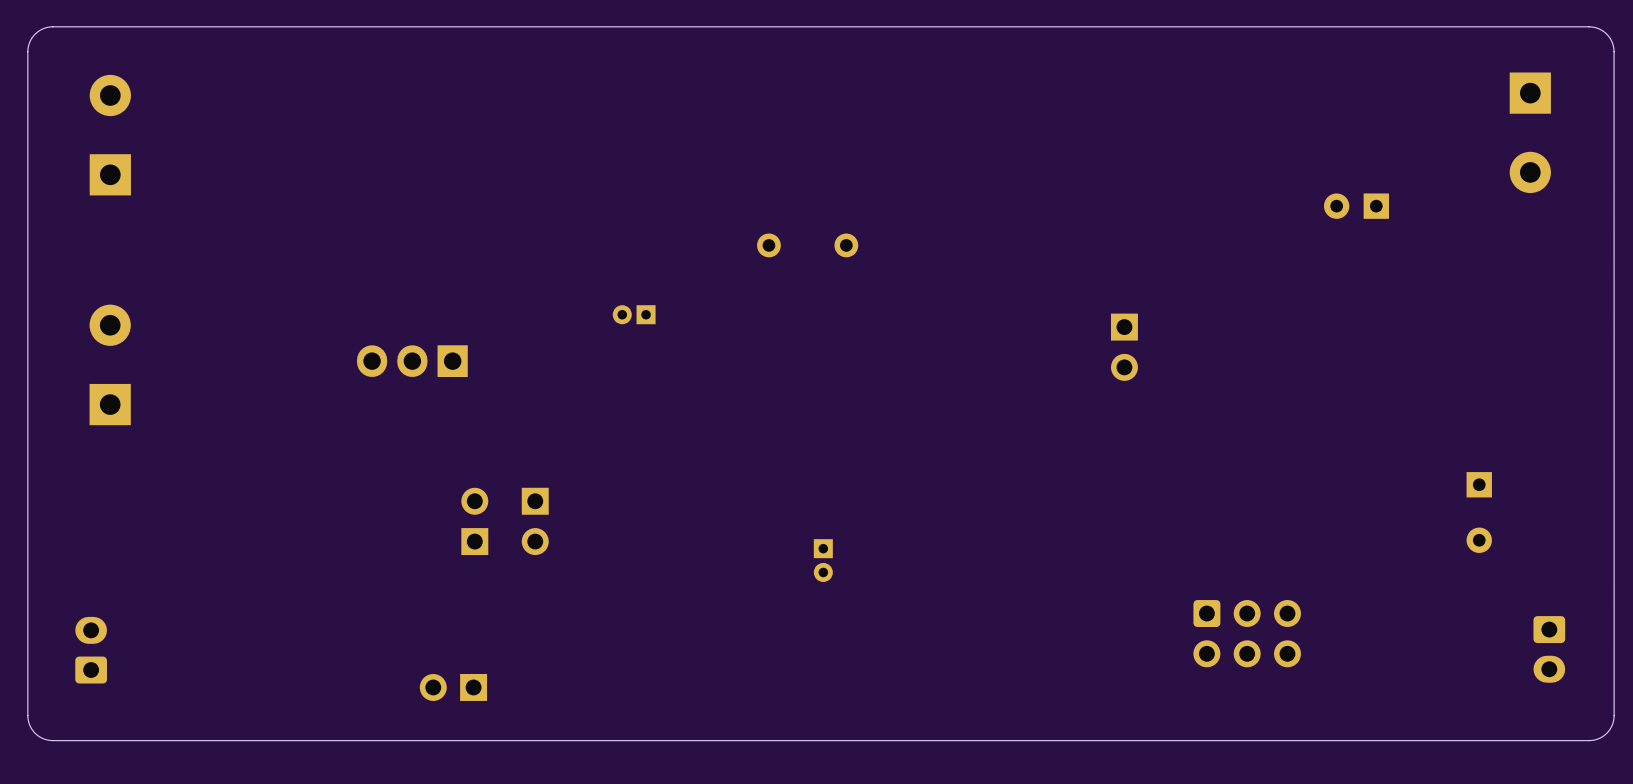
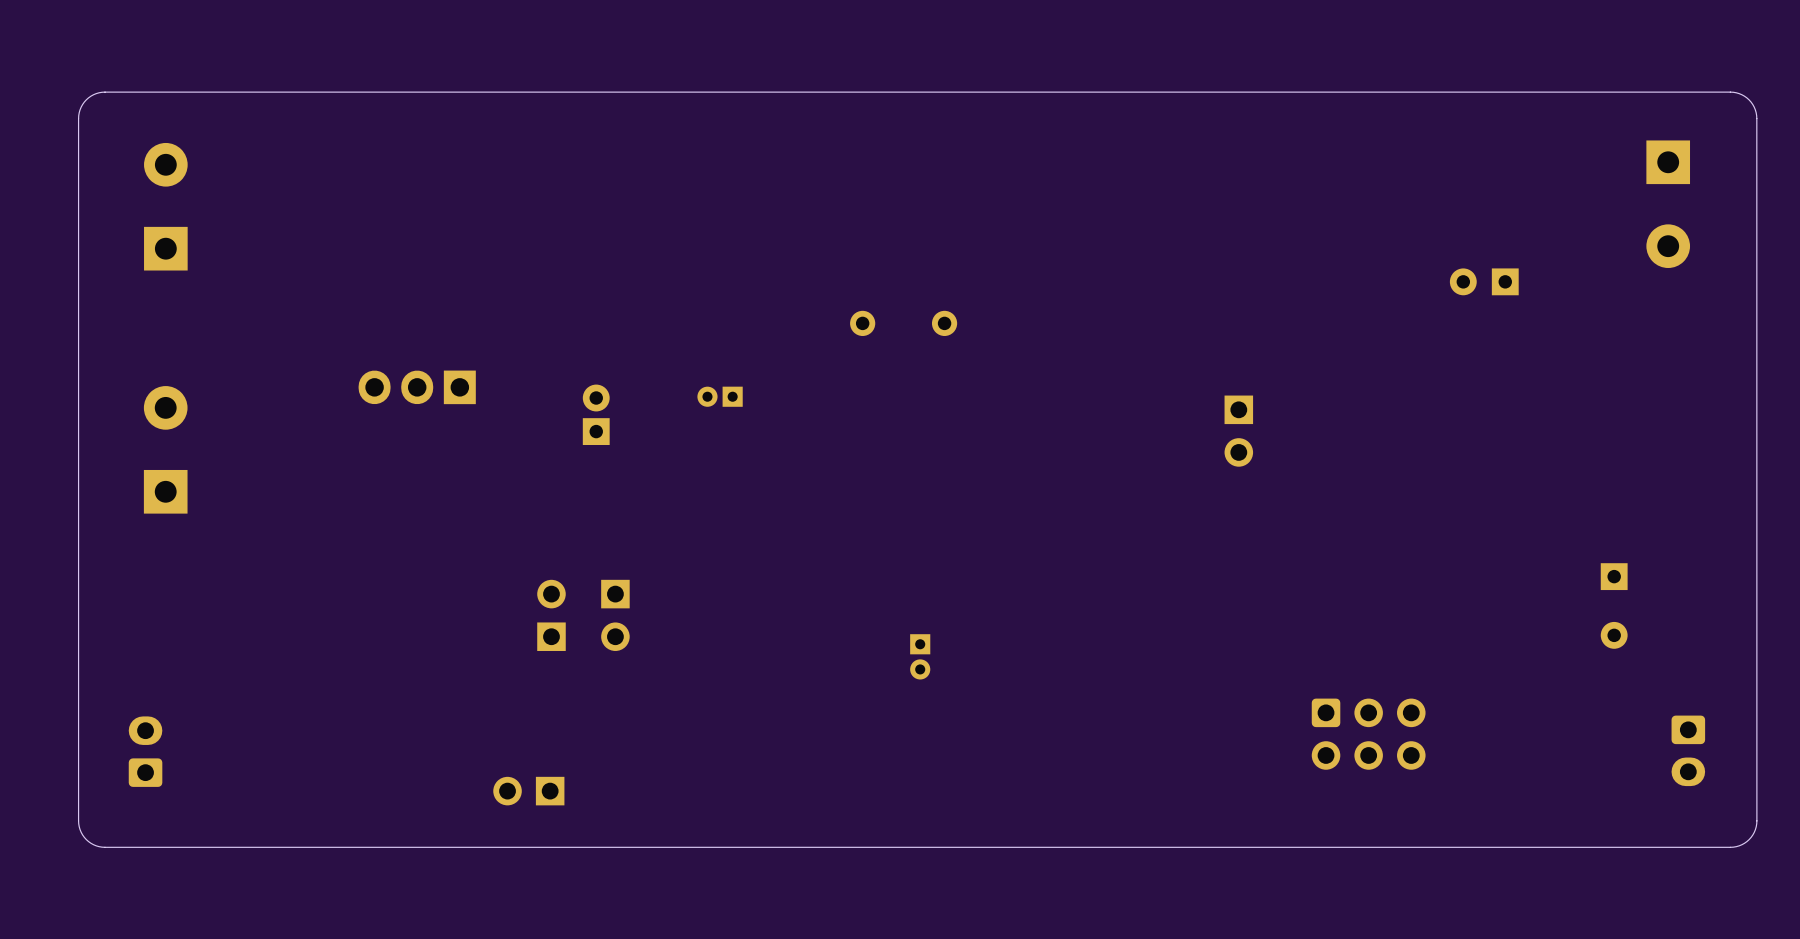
part: none -> (596, 414)
part position: (412, 361) -> (417, 387)

